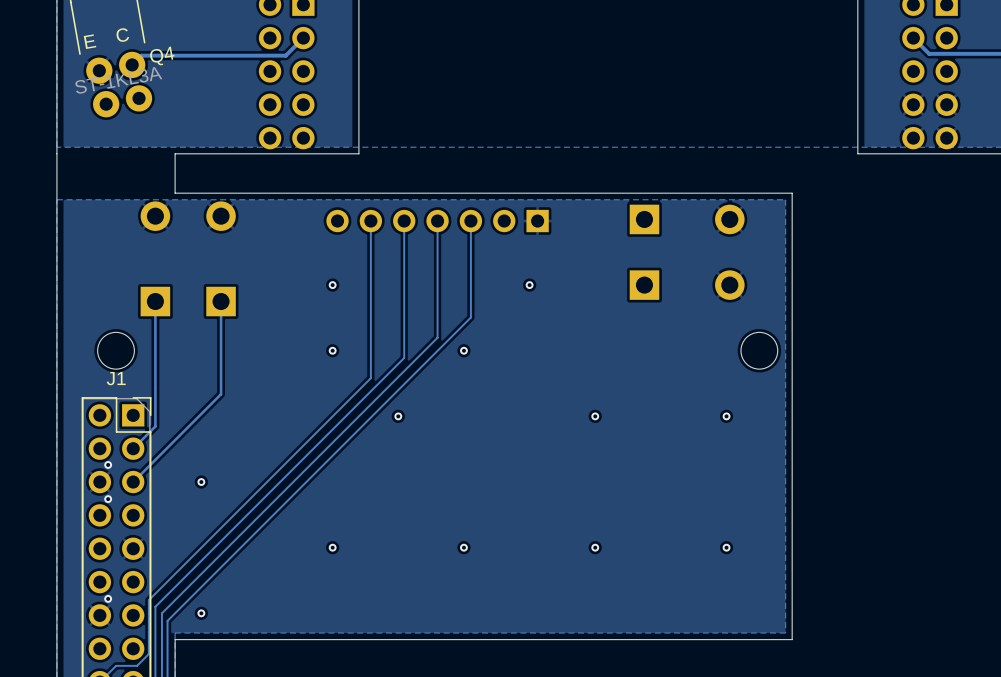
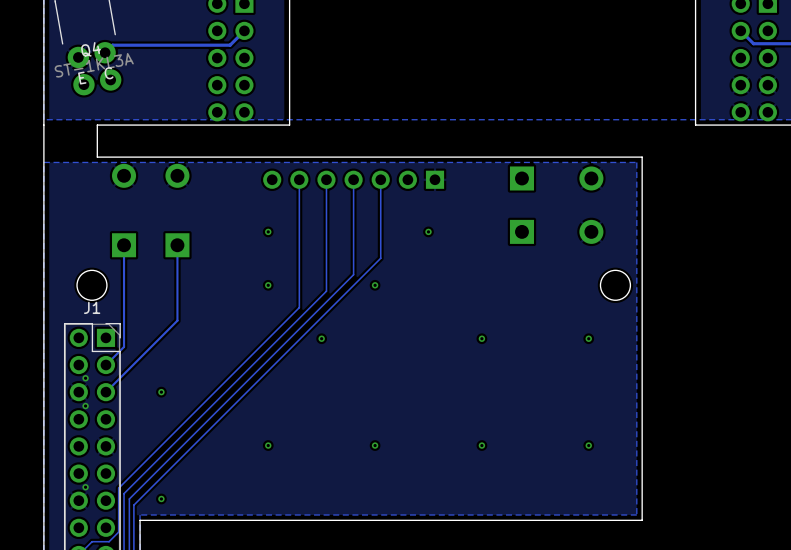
Q4 text position: C (122, 35) -> C (109, 73)
Q4 text position: E (90, 41) -> E (82, 78)
Q4 name position: Q4 (162, 56) -> Q4 (91, 49)
board edge: (175, 153) (175, 193) -> (140, 125) (97, 125) (97, 157) (140, 157)

